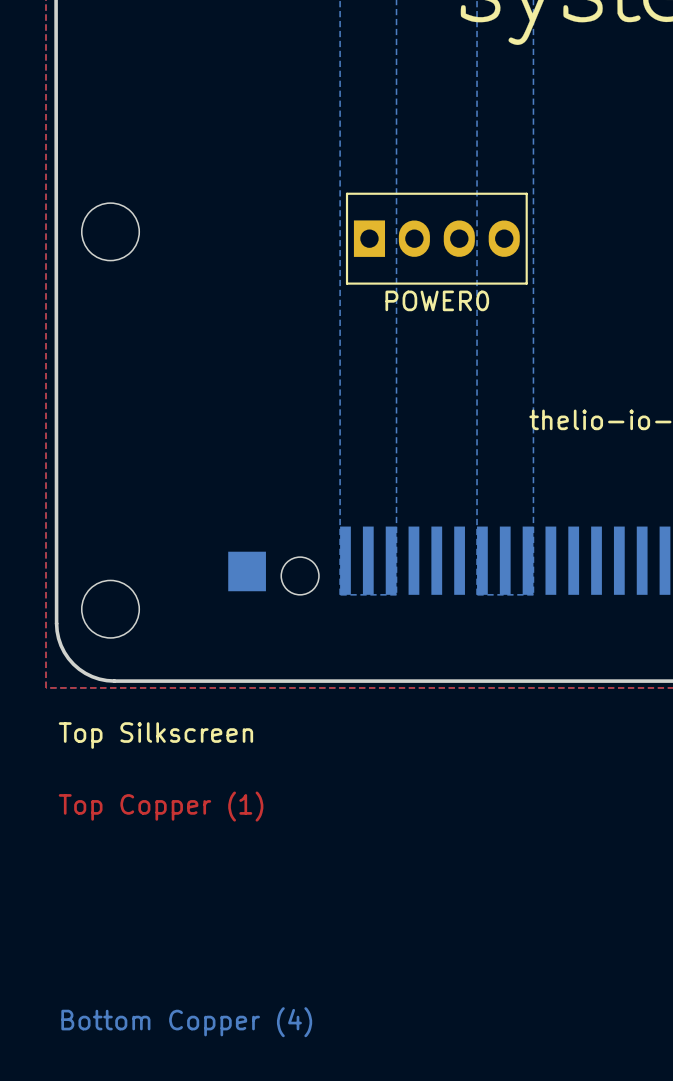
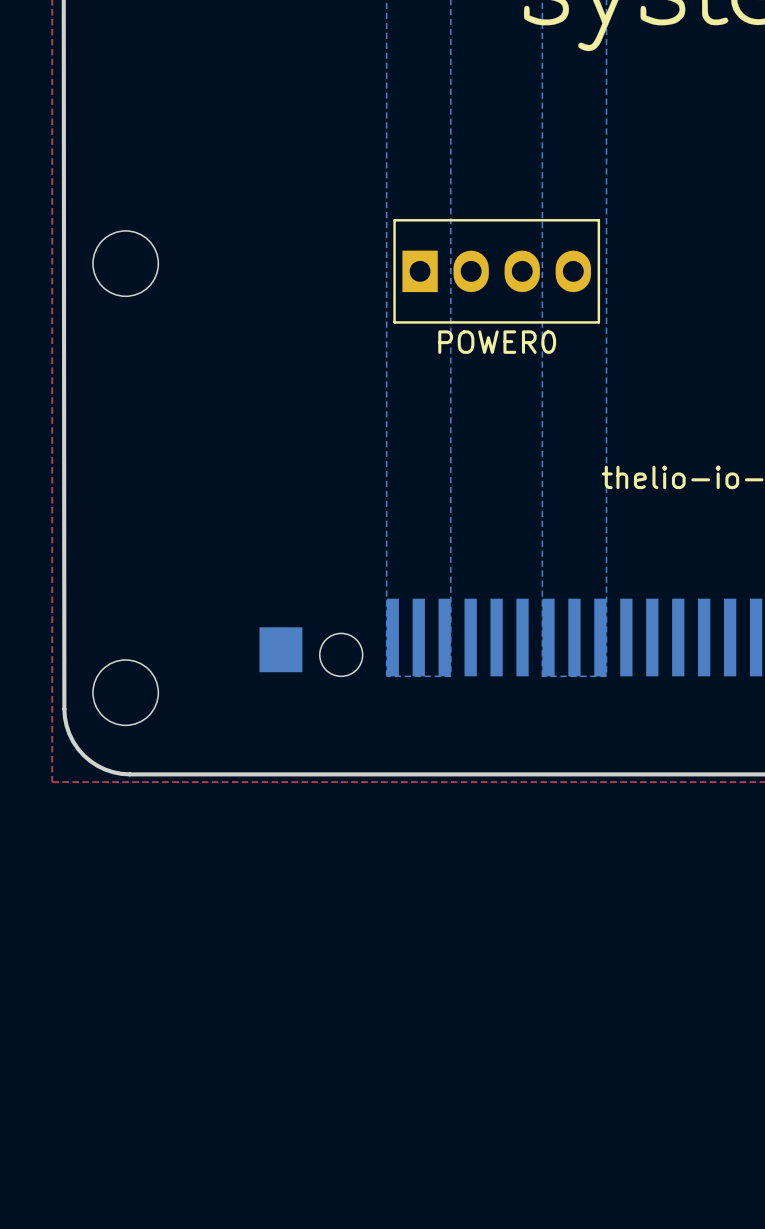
text: Top Silkscreen (155, 735) -> none
text: Top Copper (1) (161, 806) -> none
text: Bottom Copper (4) (186, 1022) -> none

